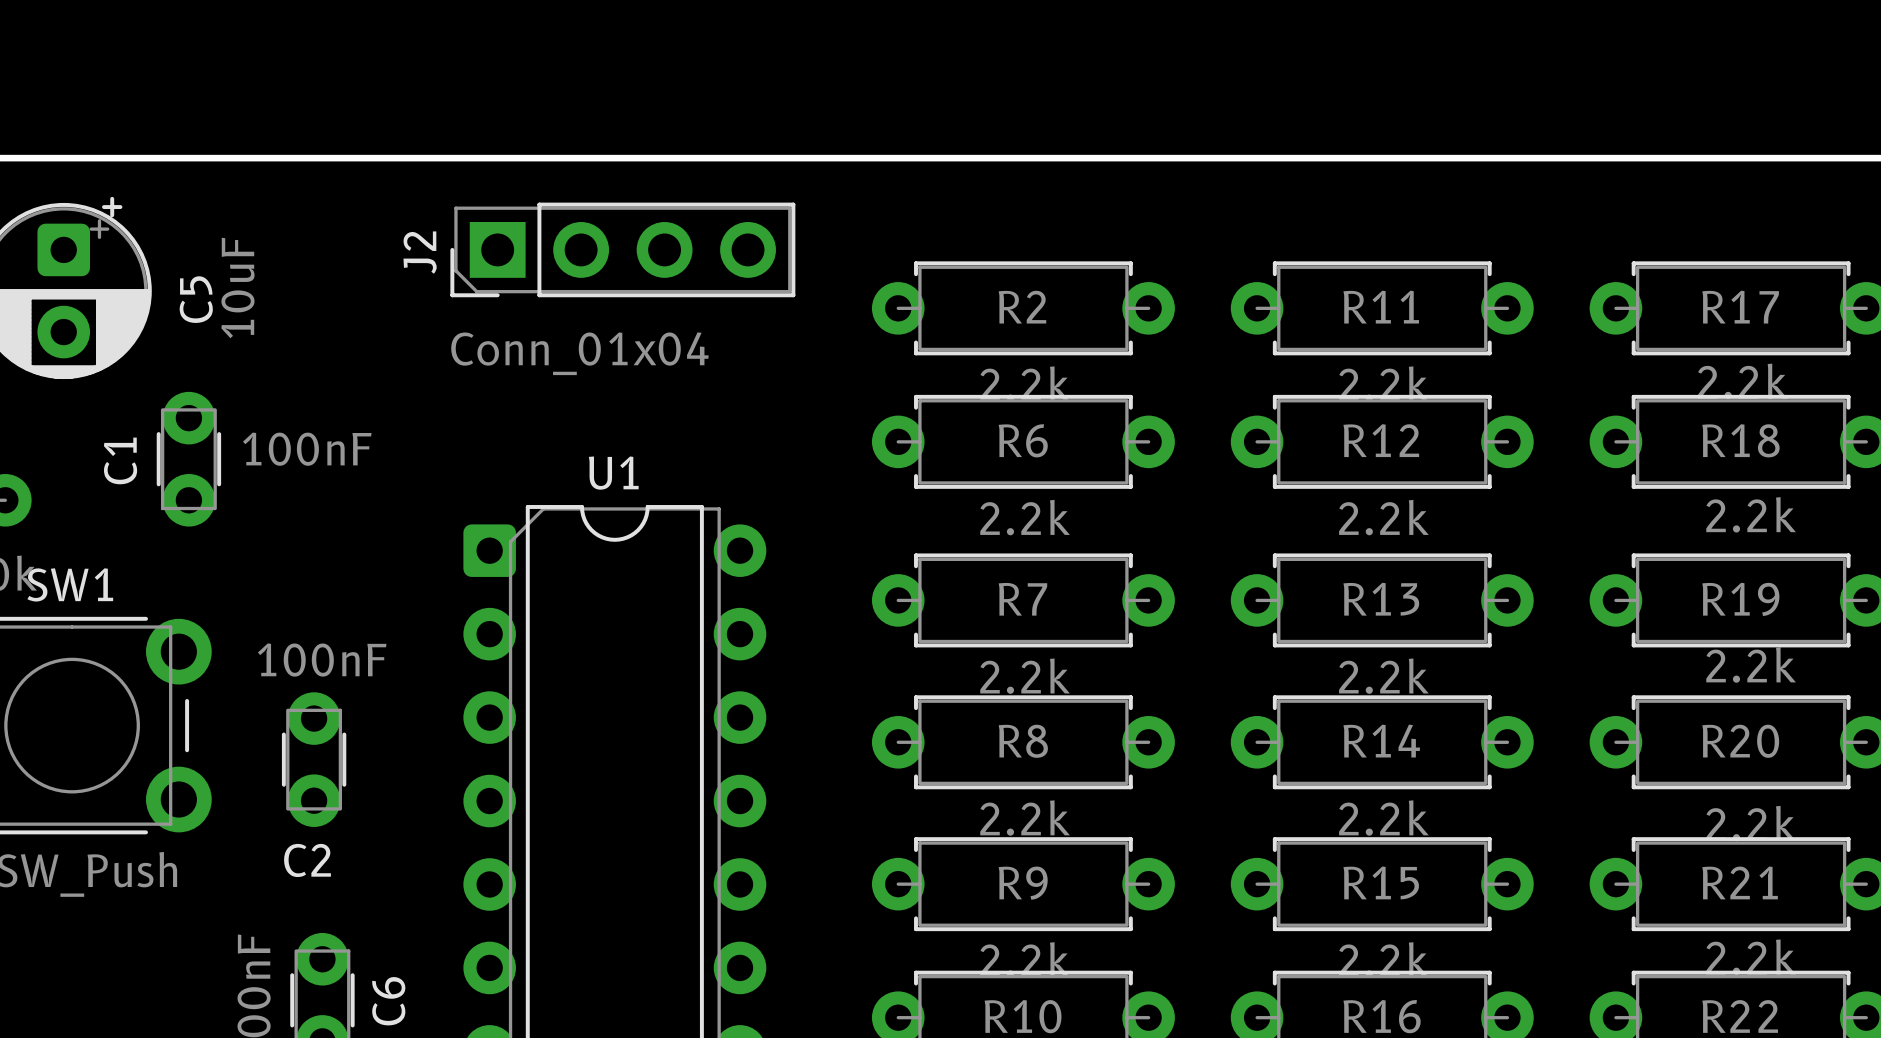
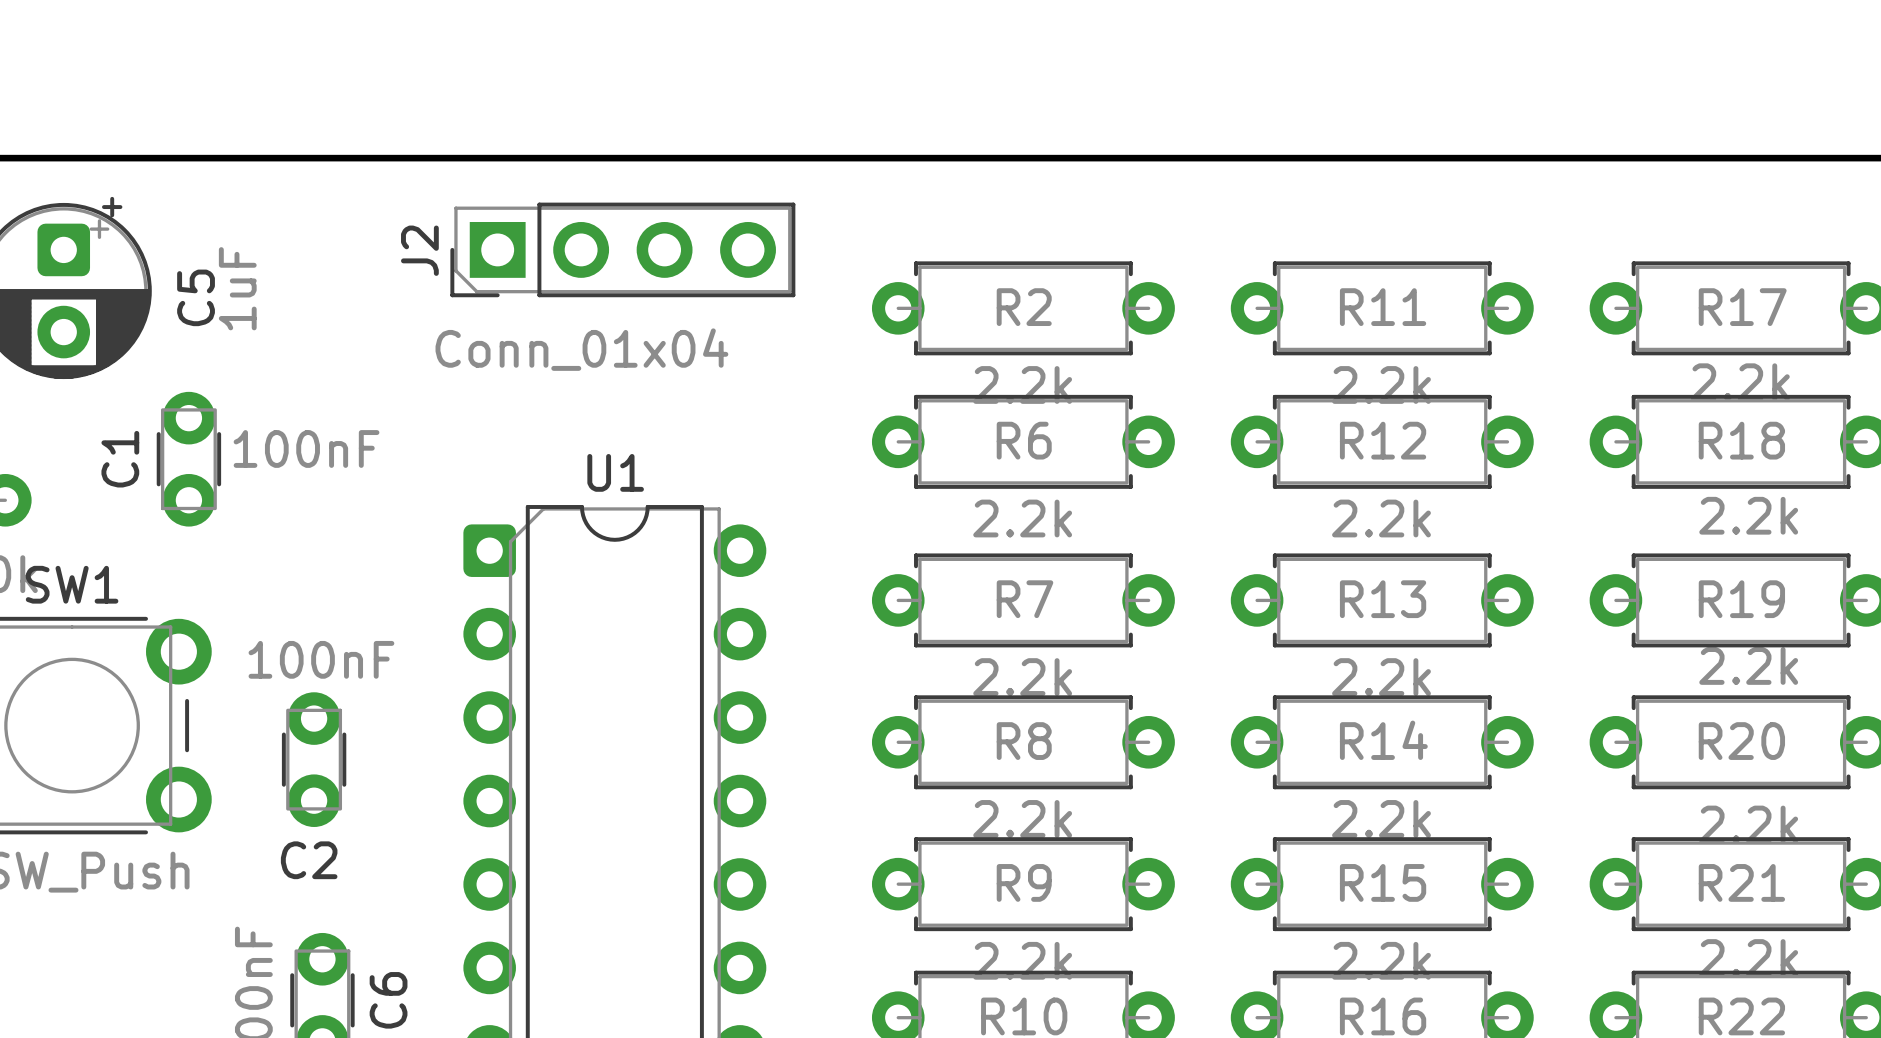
C5 value: 10uF (237, 287) -> 1uF (237, 288)

